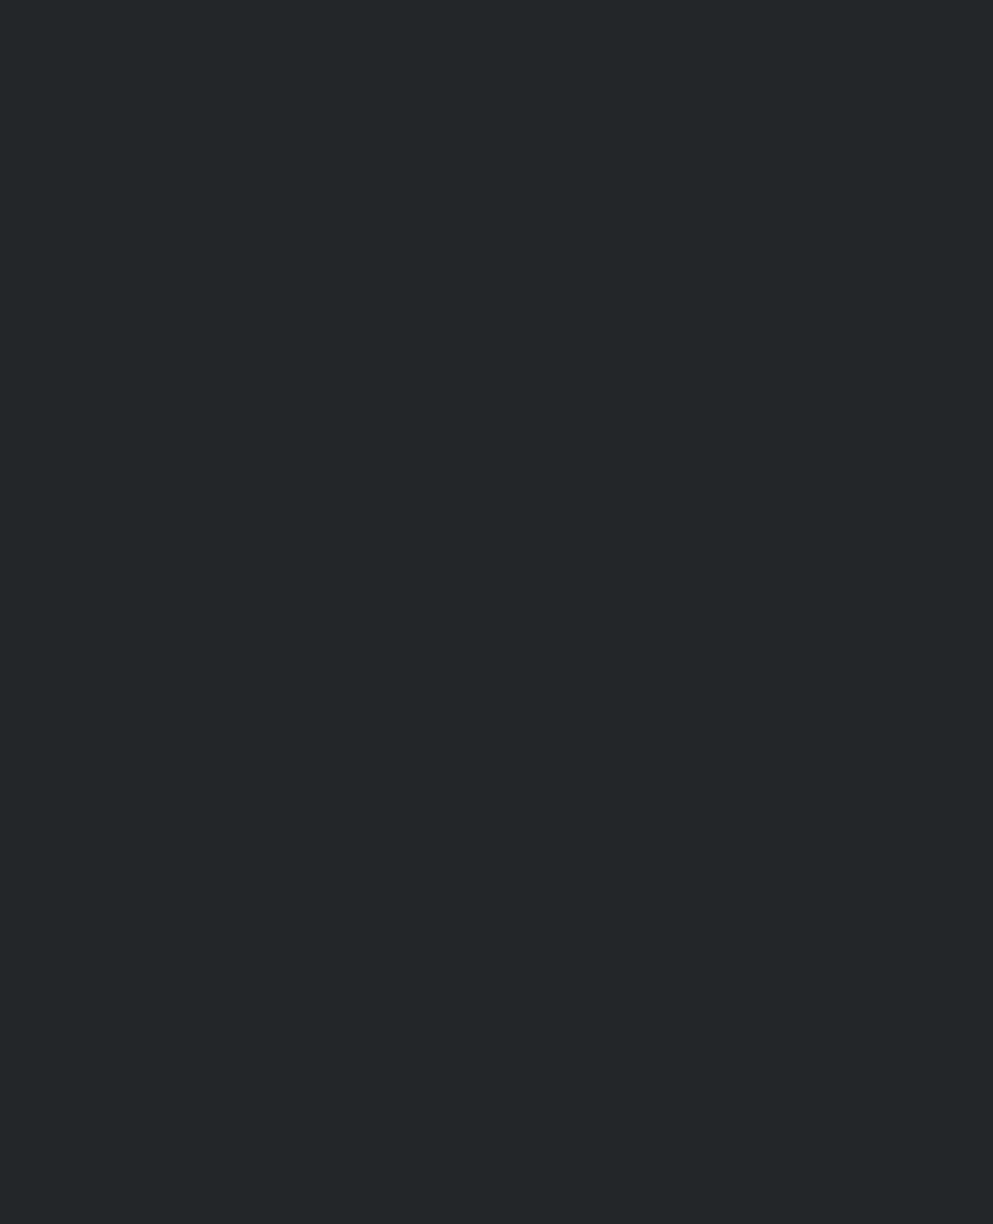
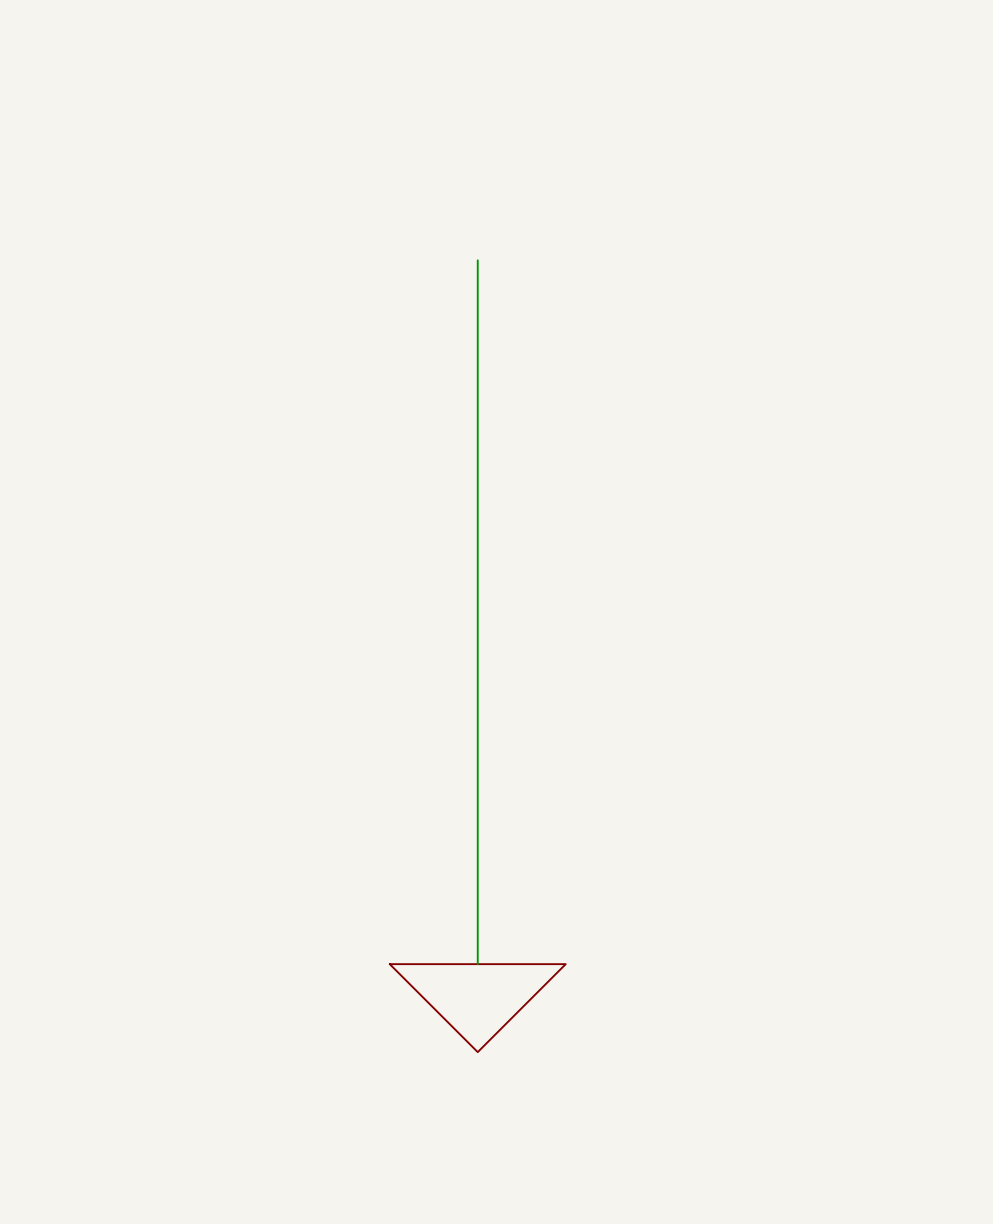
wire: none -> (477, 260) (477, 964)
power symbol: none -> (477, 1008)

